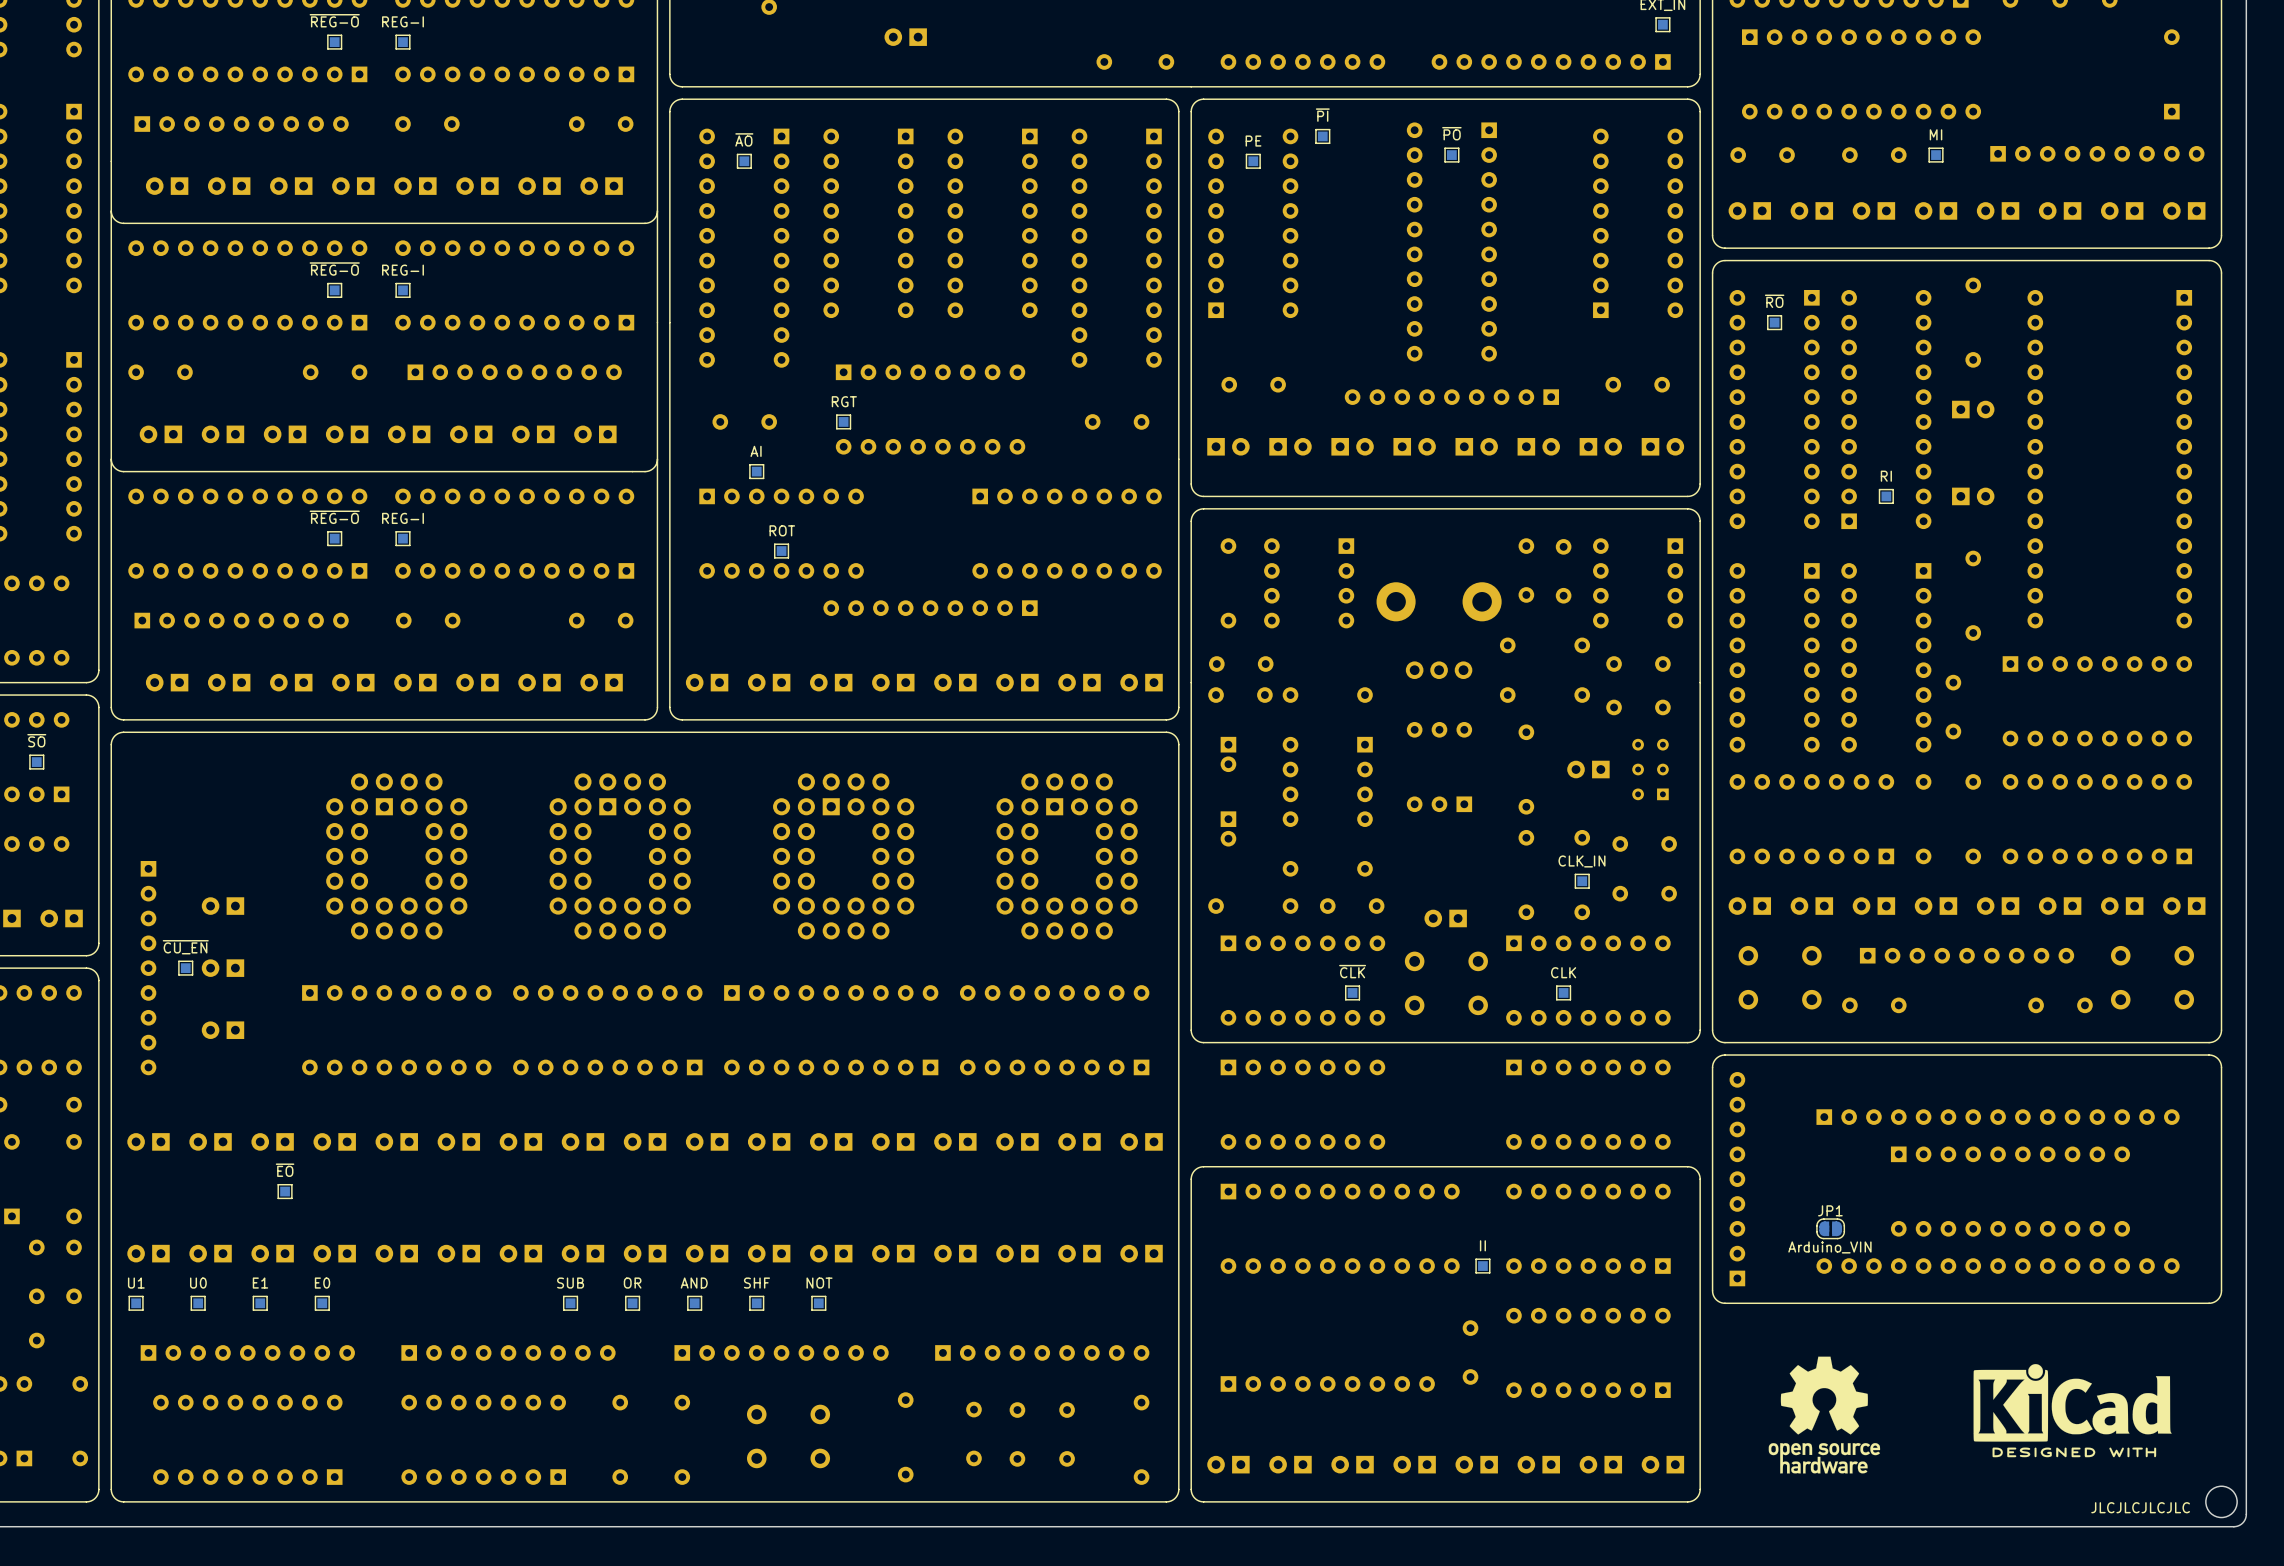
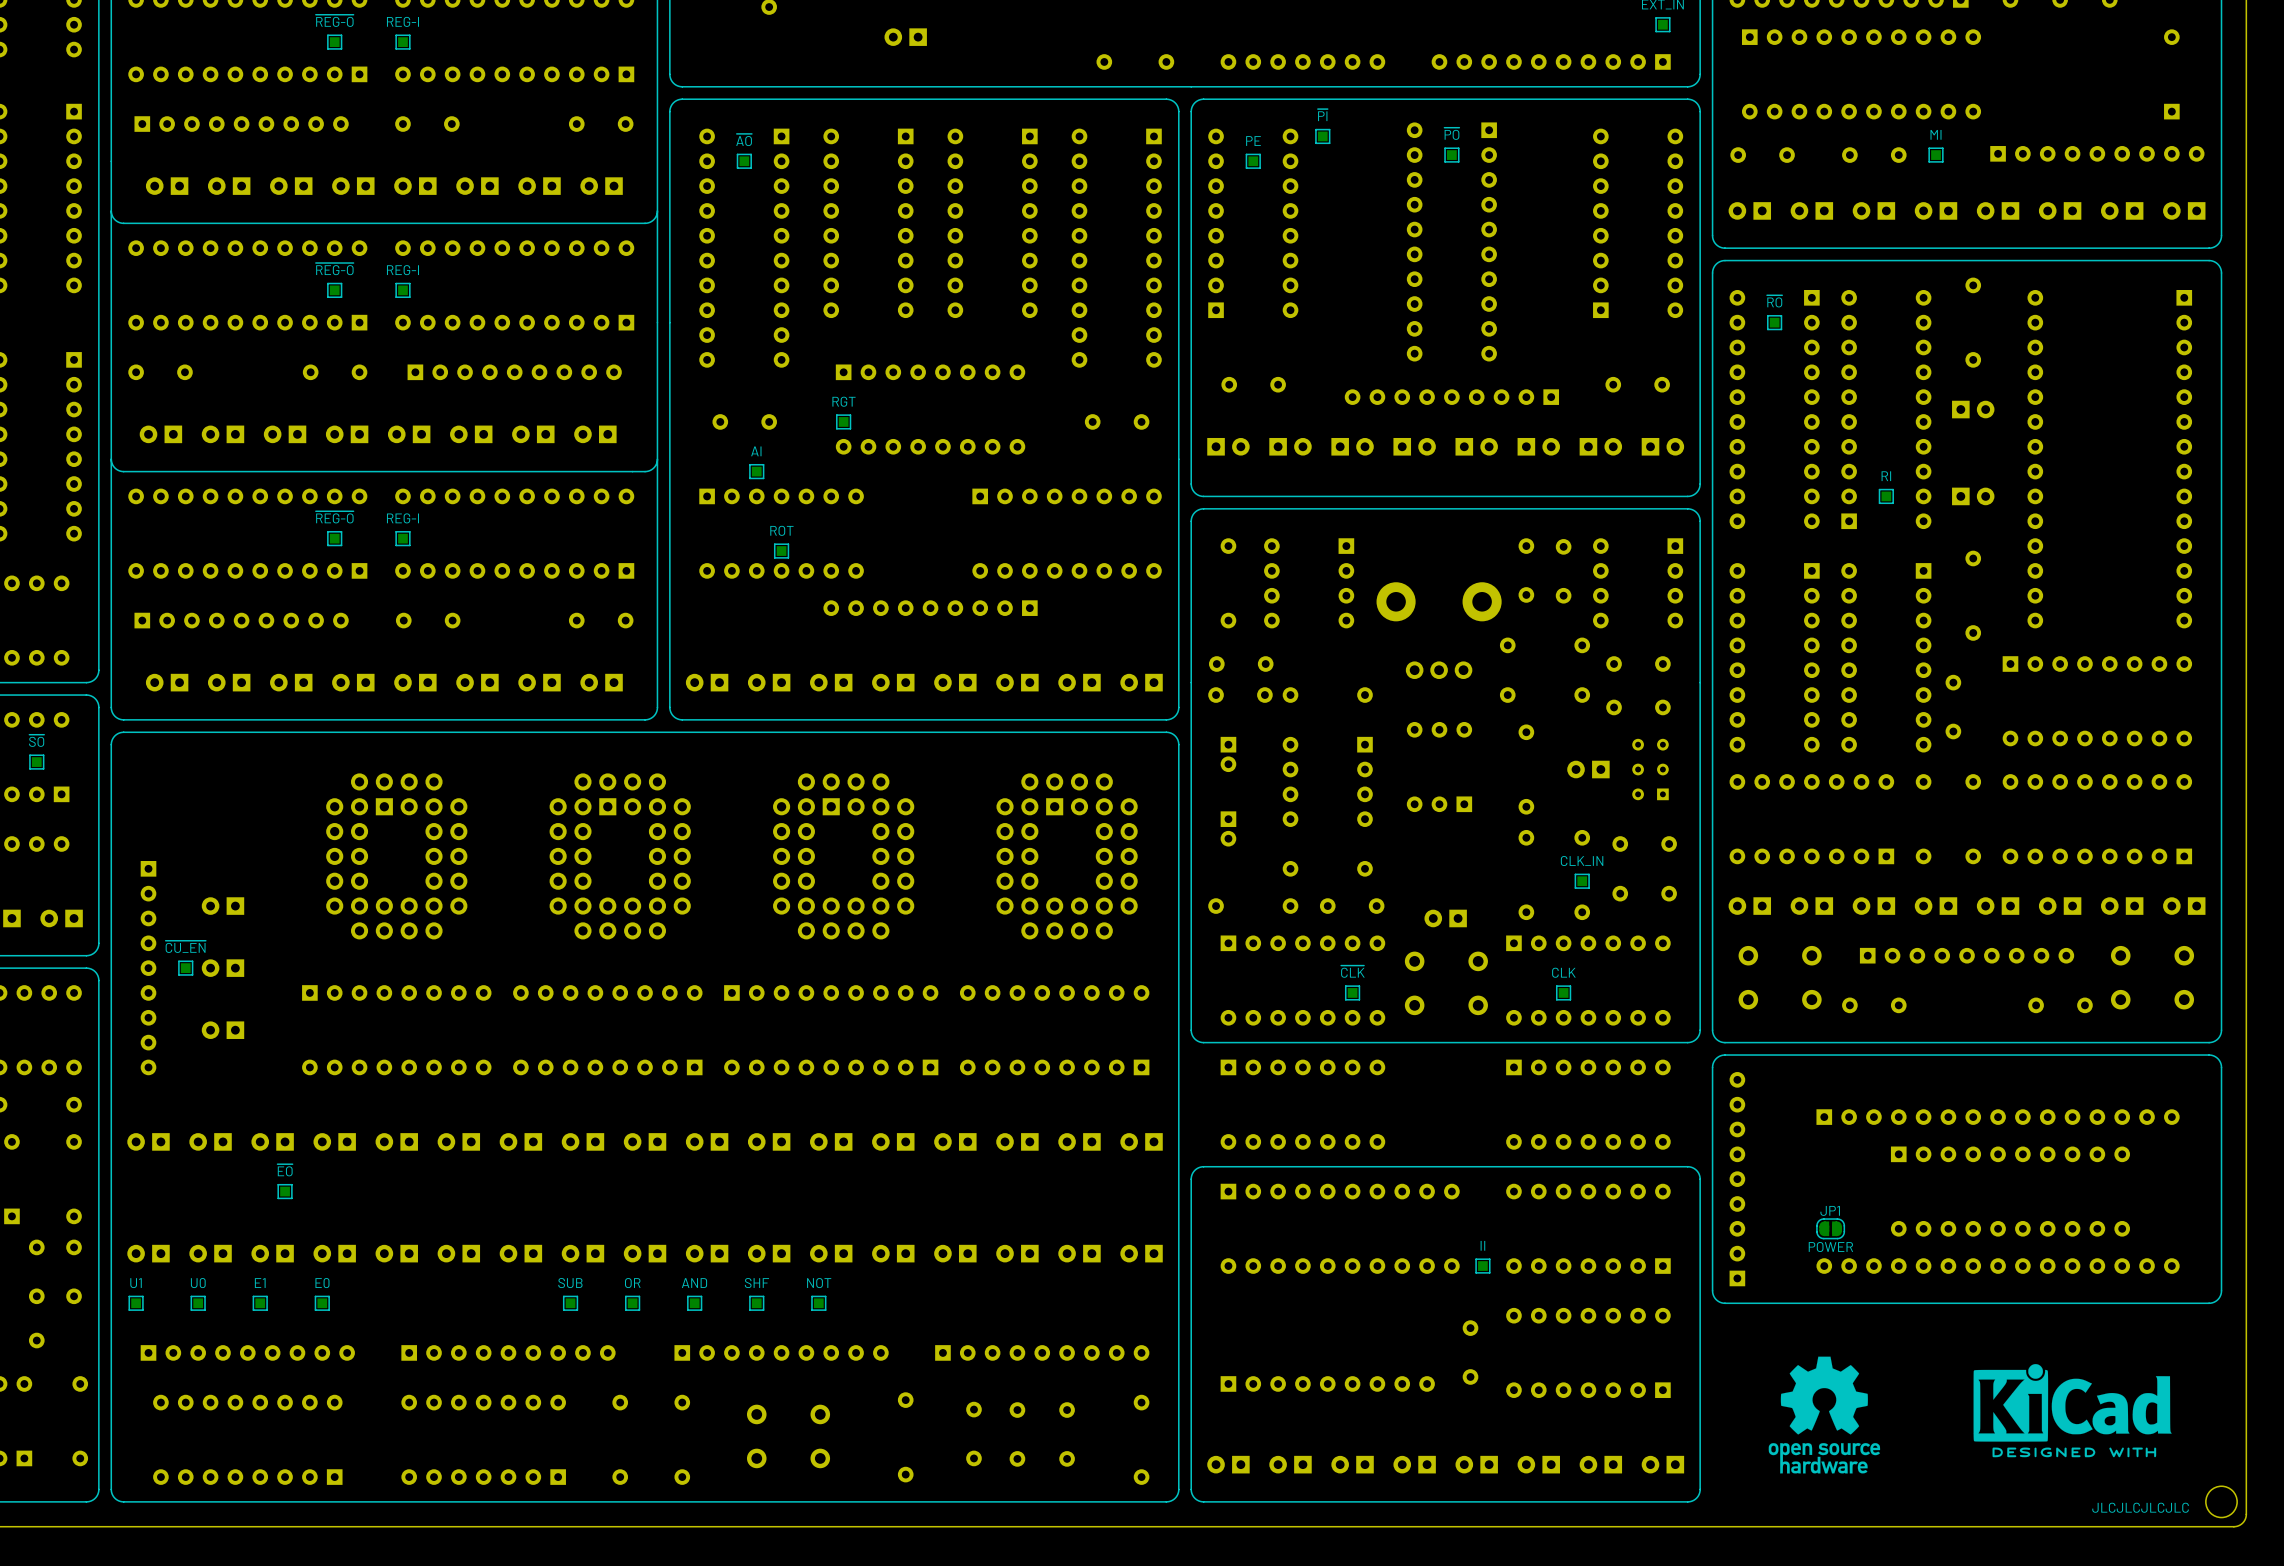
JP1 value: Arduino_VIN (1829, 1247) -> POWER (1830, 1247)

